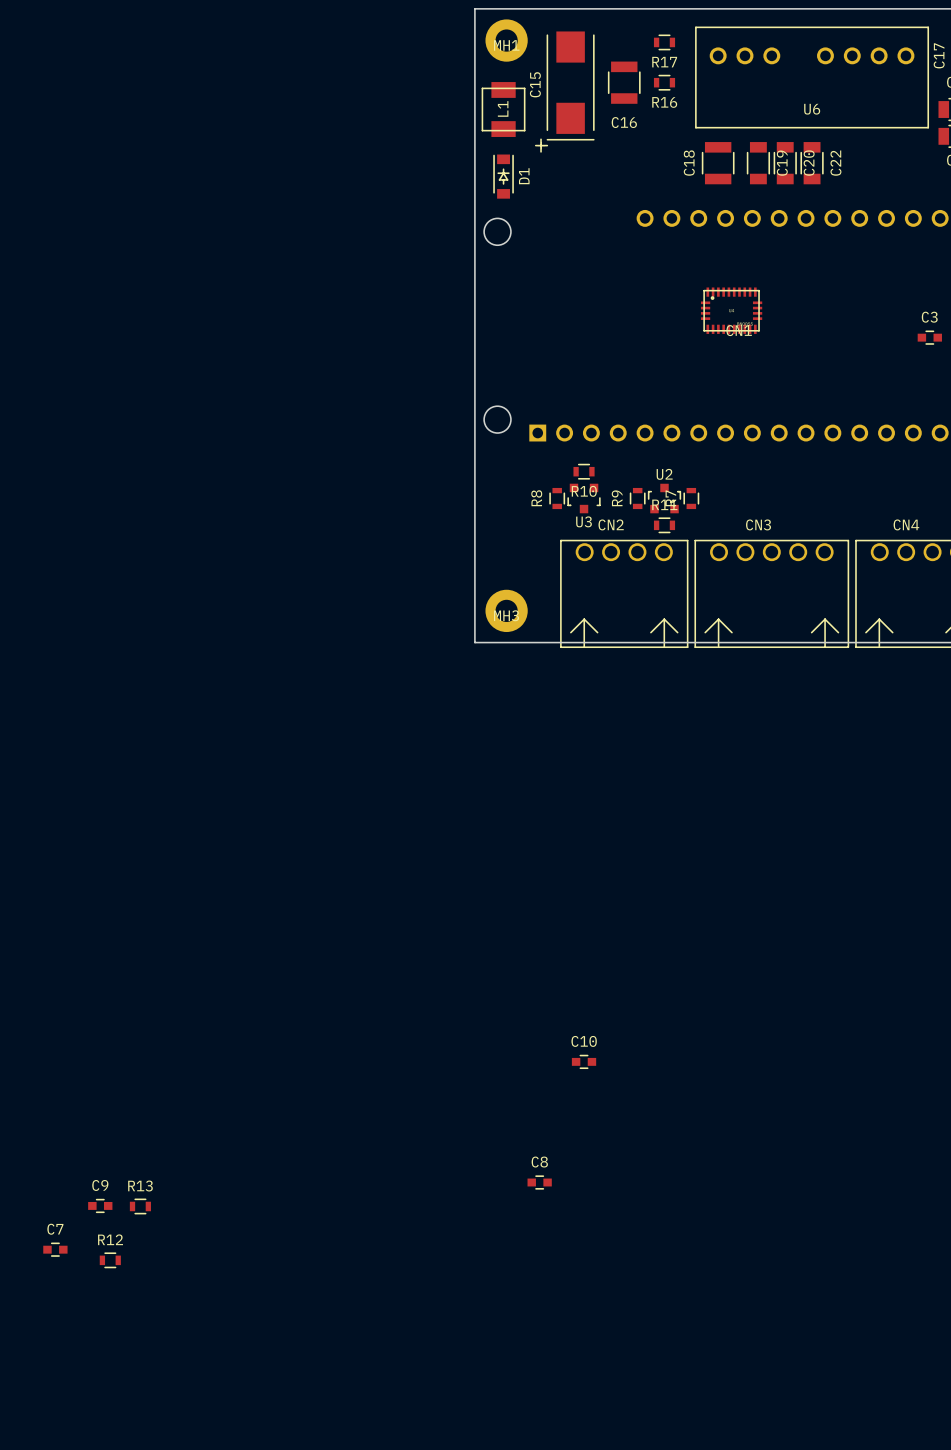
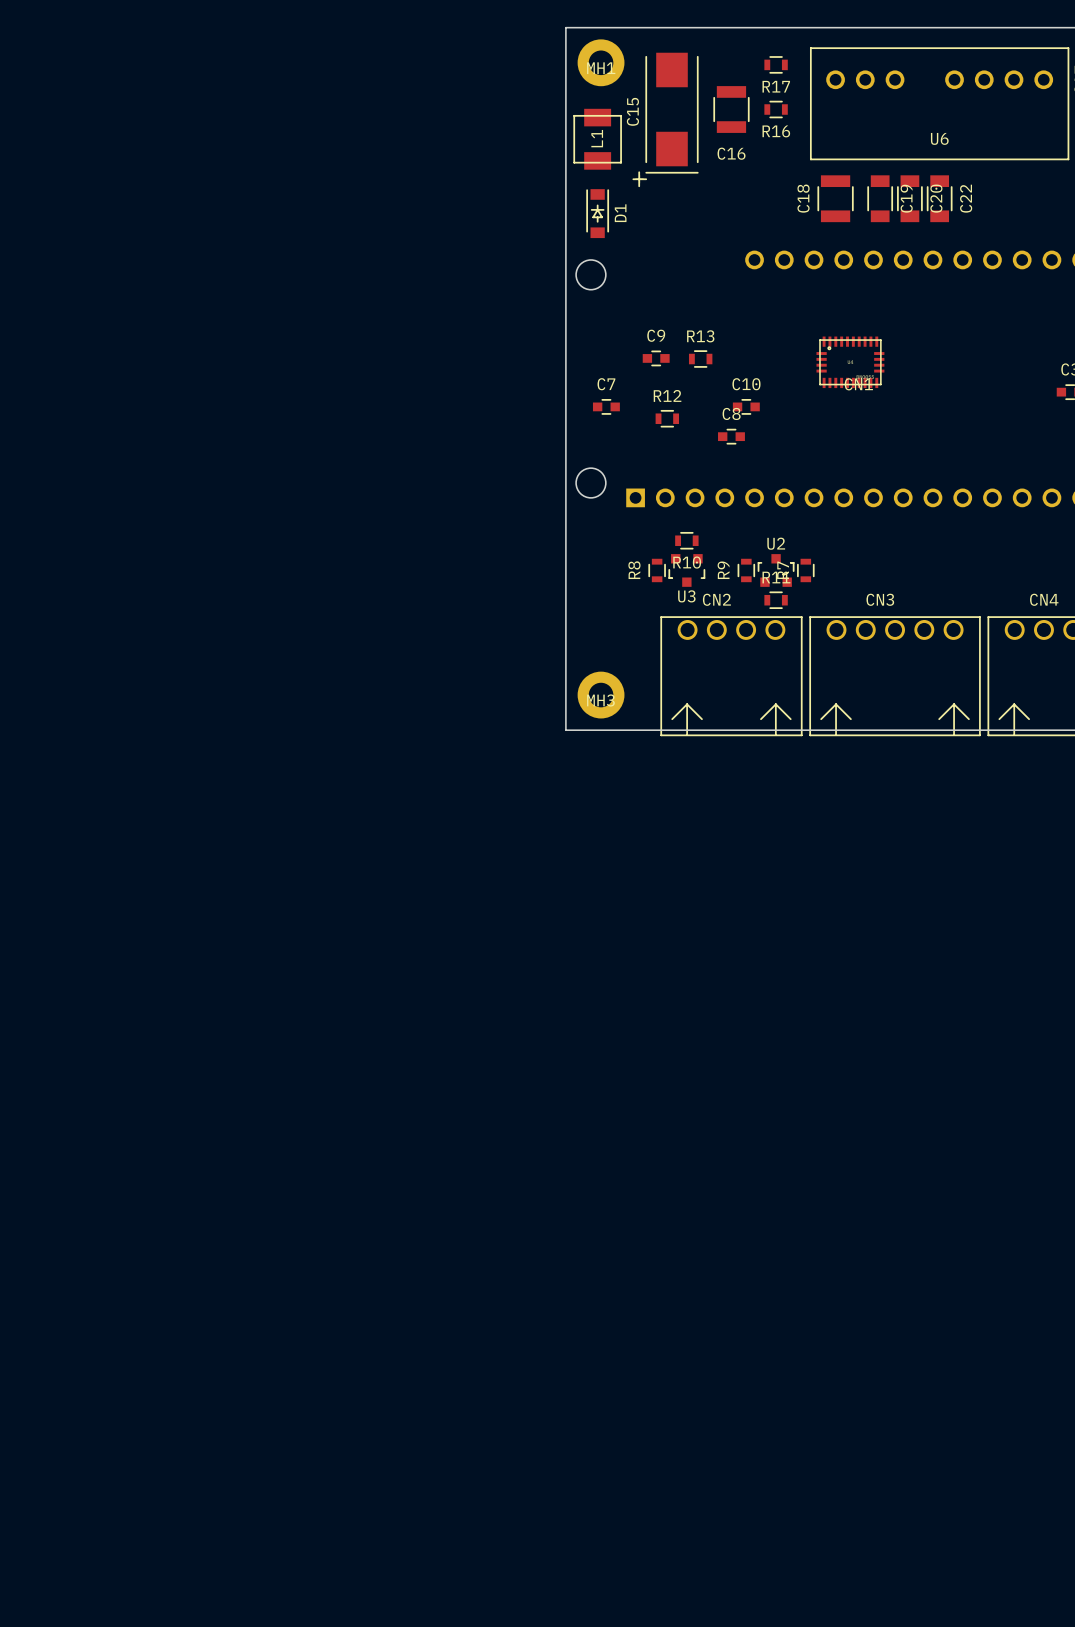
C10 position: (584, 1061) -> (746, 406)
C8 position: (539, 1182) -> (731, 436)
C9 position: (100, 1205) -> (656, 358)
R13 position: (140, 1206) -> (700, 359)
C7 position: (55, 1249) -> (606, 406)
R12 position: (110, 1260) -> (667, 418)

